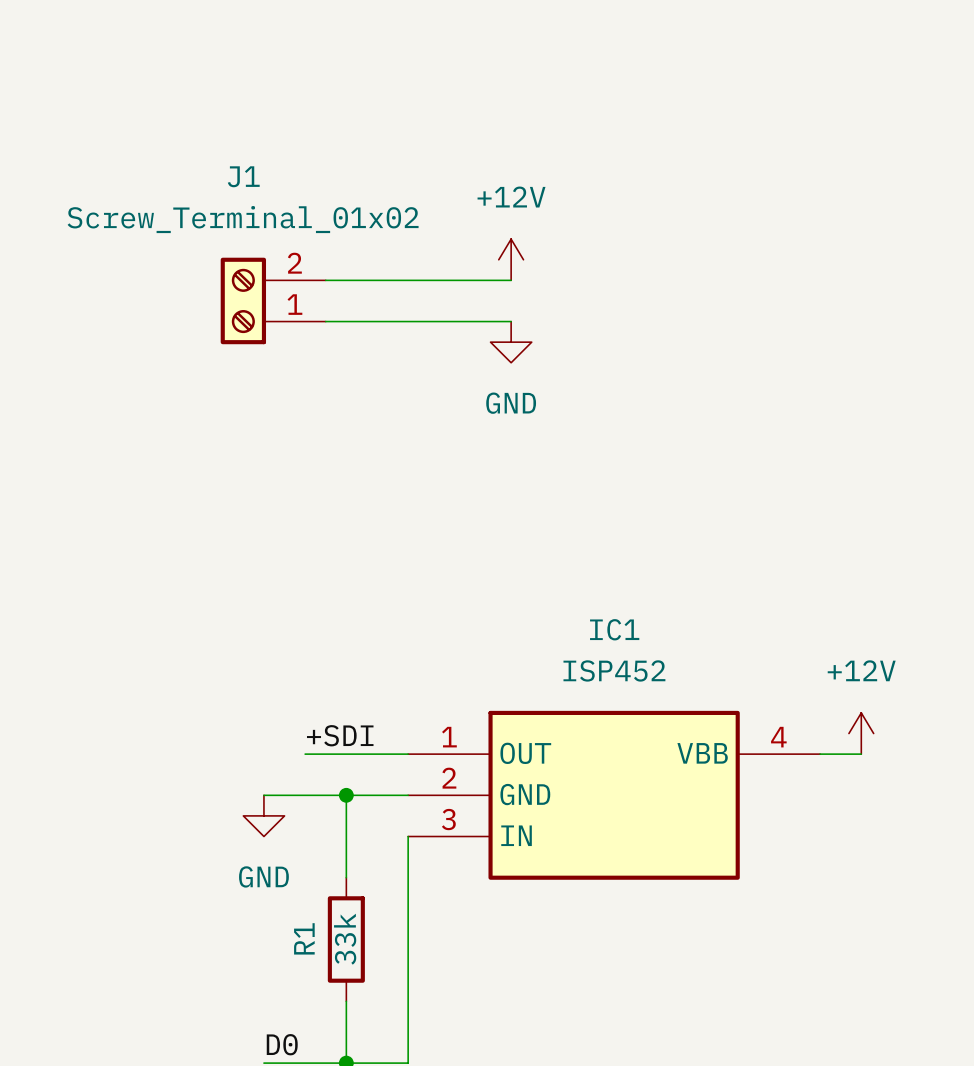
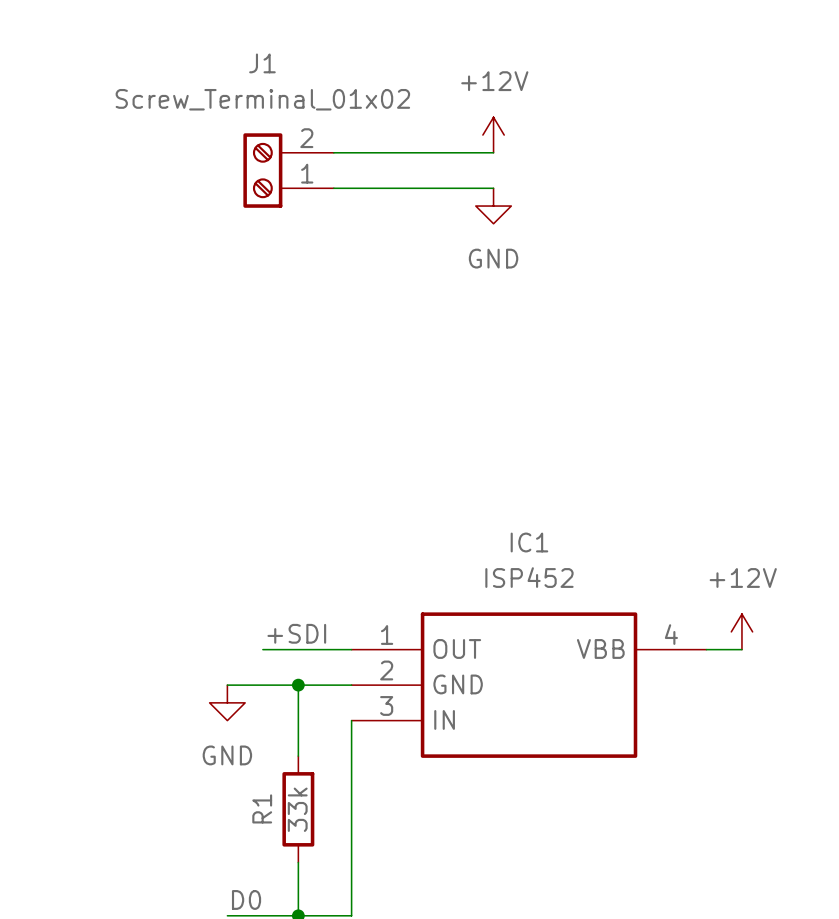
power symbol position: +12V (511, 259) -> +12V (493, 135)
wire: (325, 280) (511, 280) -> (333, 188) (493, 188)
J1 position: (273, 300) -> (288, 170)
wire: (325, 321) (511, 321) -> (333, 152) (493, 152)
power symbol position: GND (511, 342) -> GND (493, 206)

